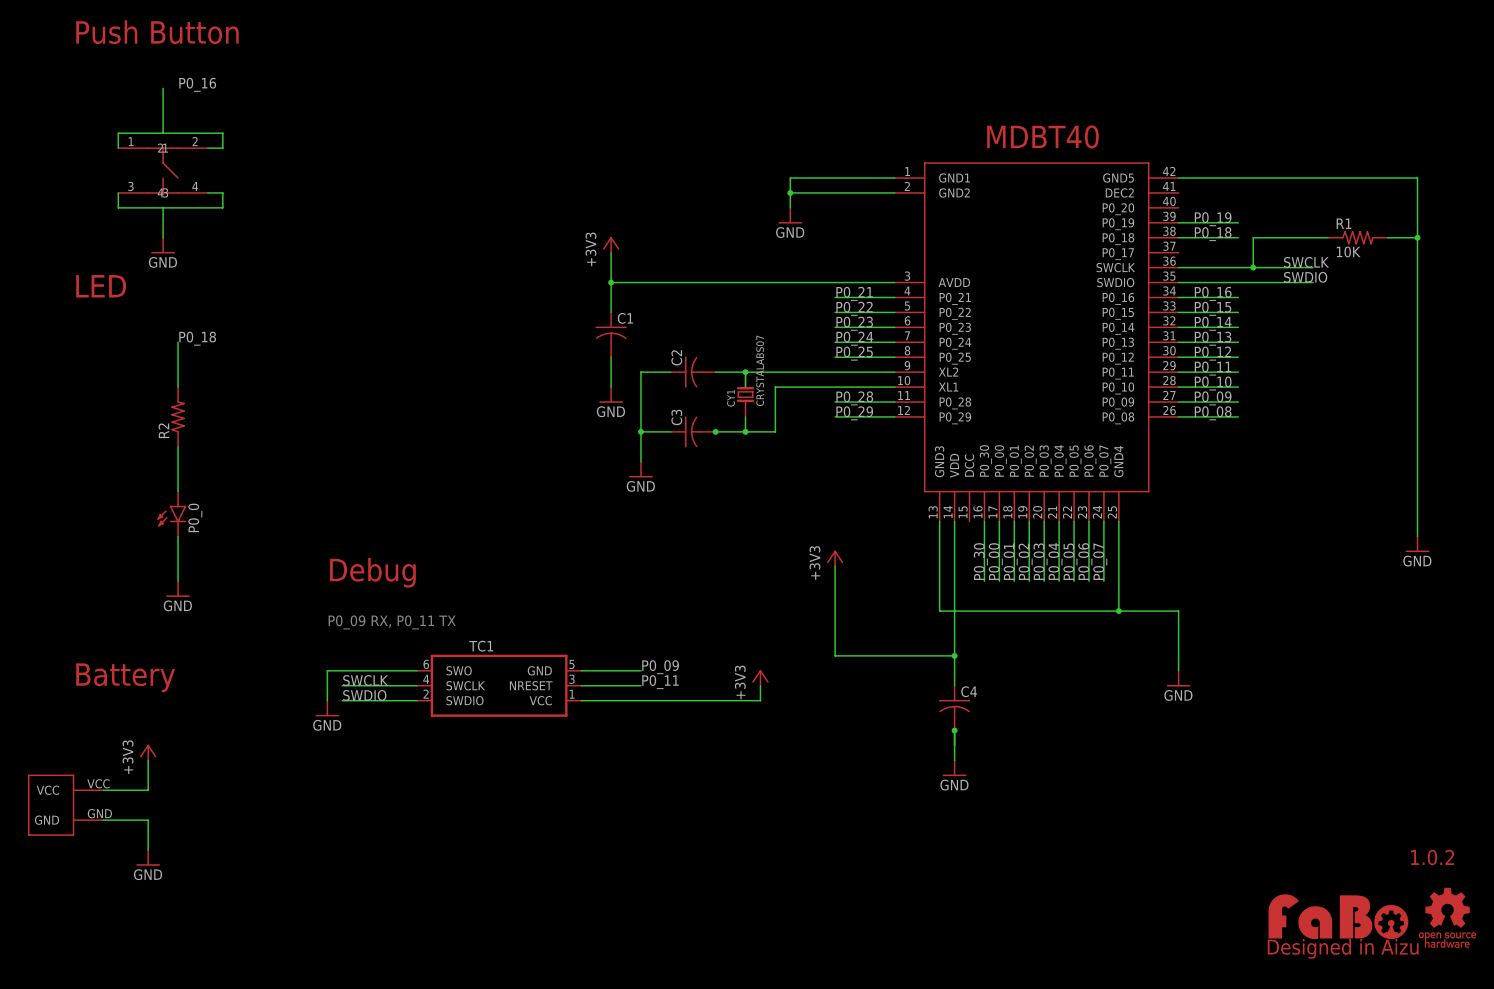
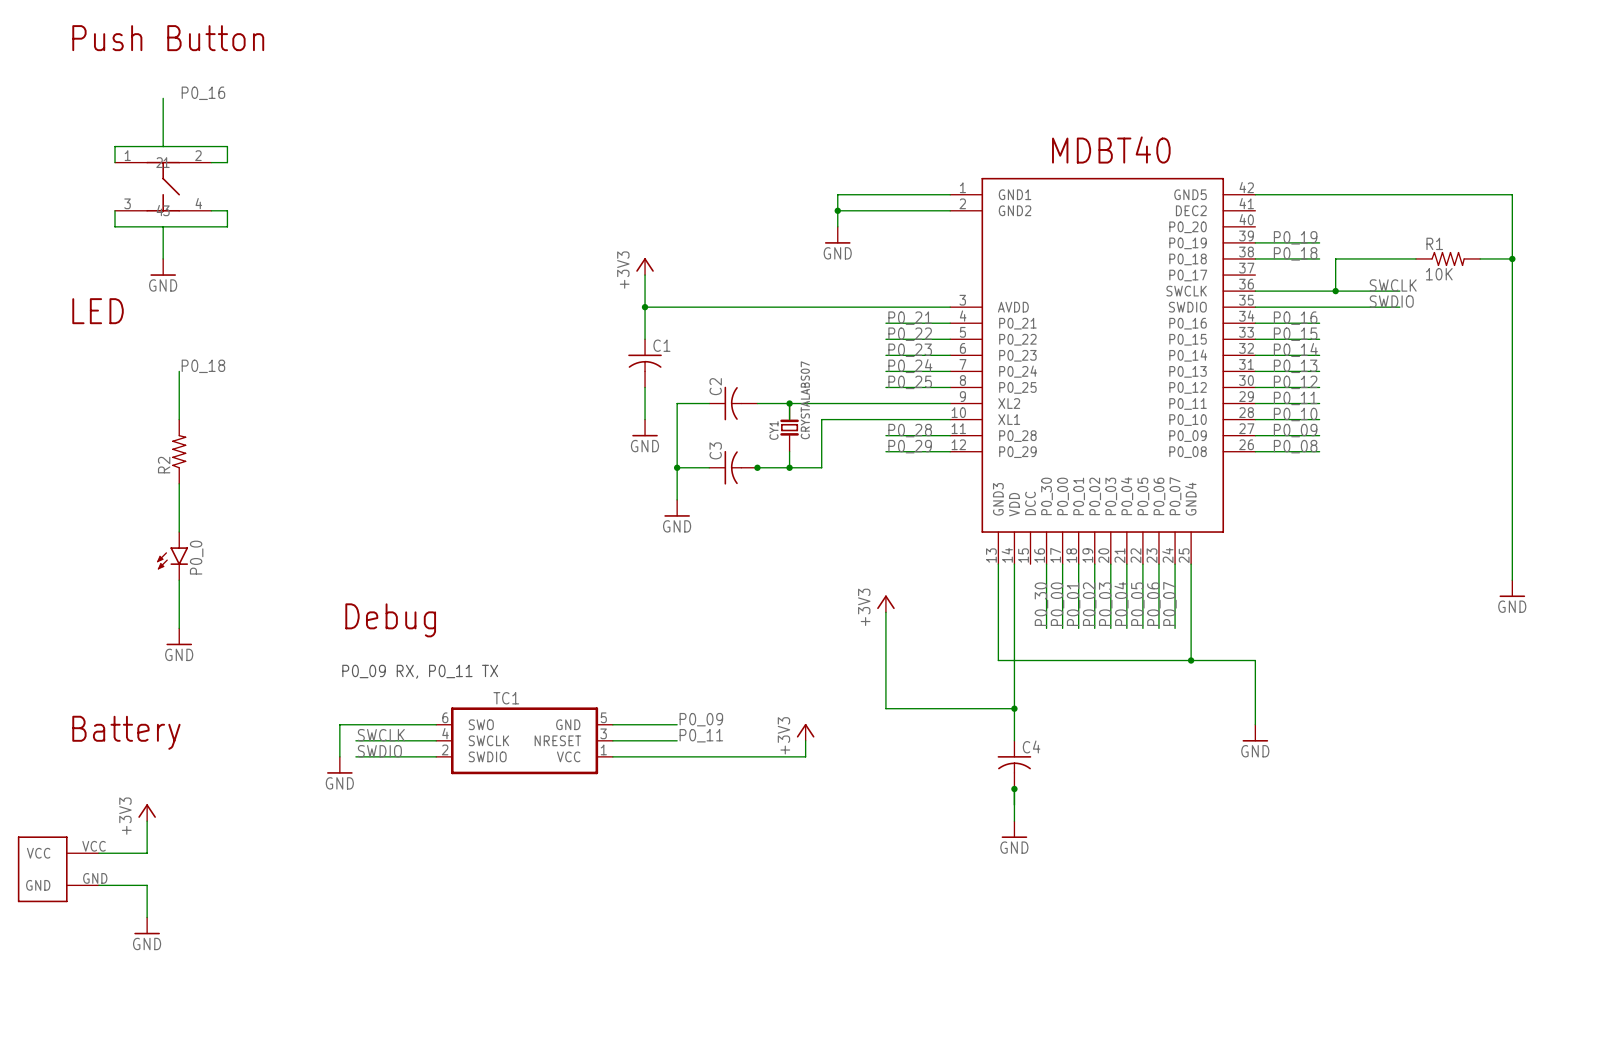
text: 1.0.2 (1432, 857) -> none
part: (1338, 916) -> none
part: (1447, 917) -> none

